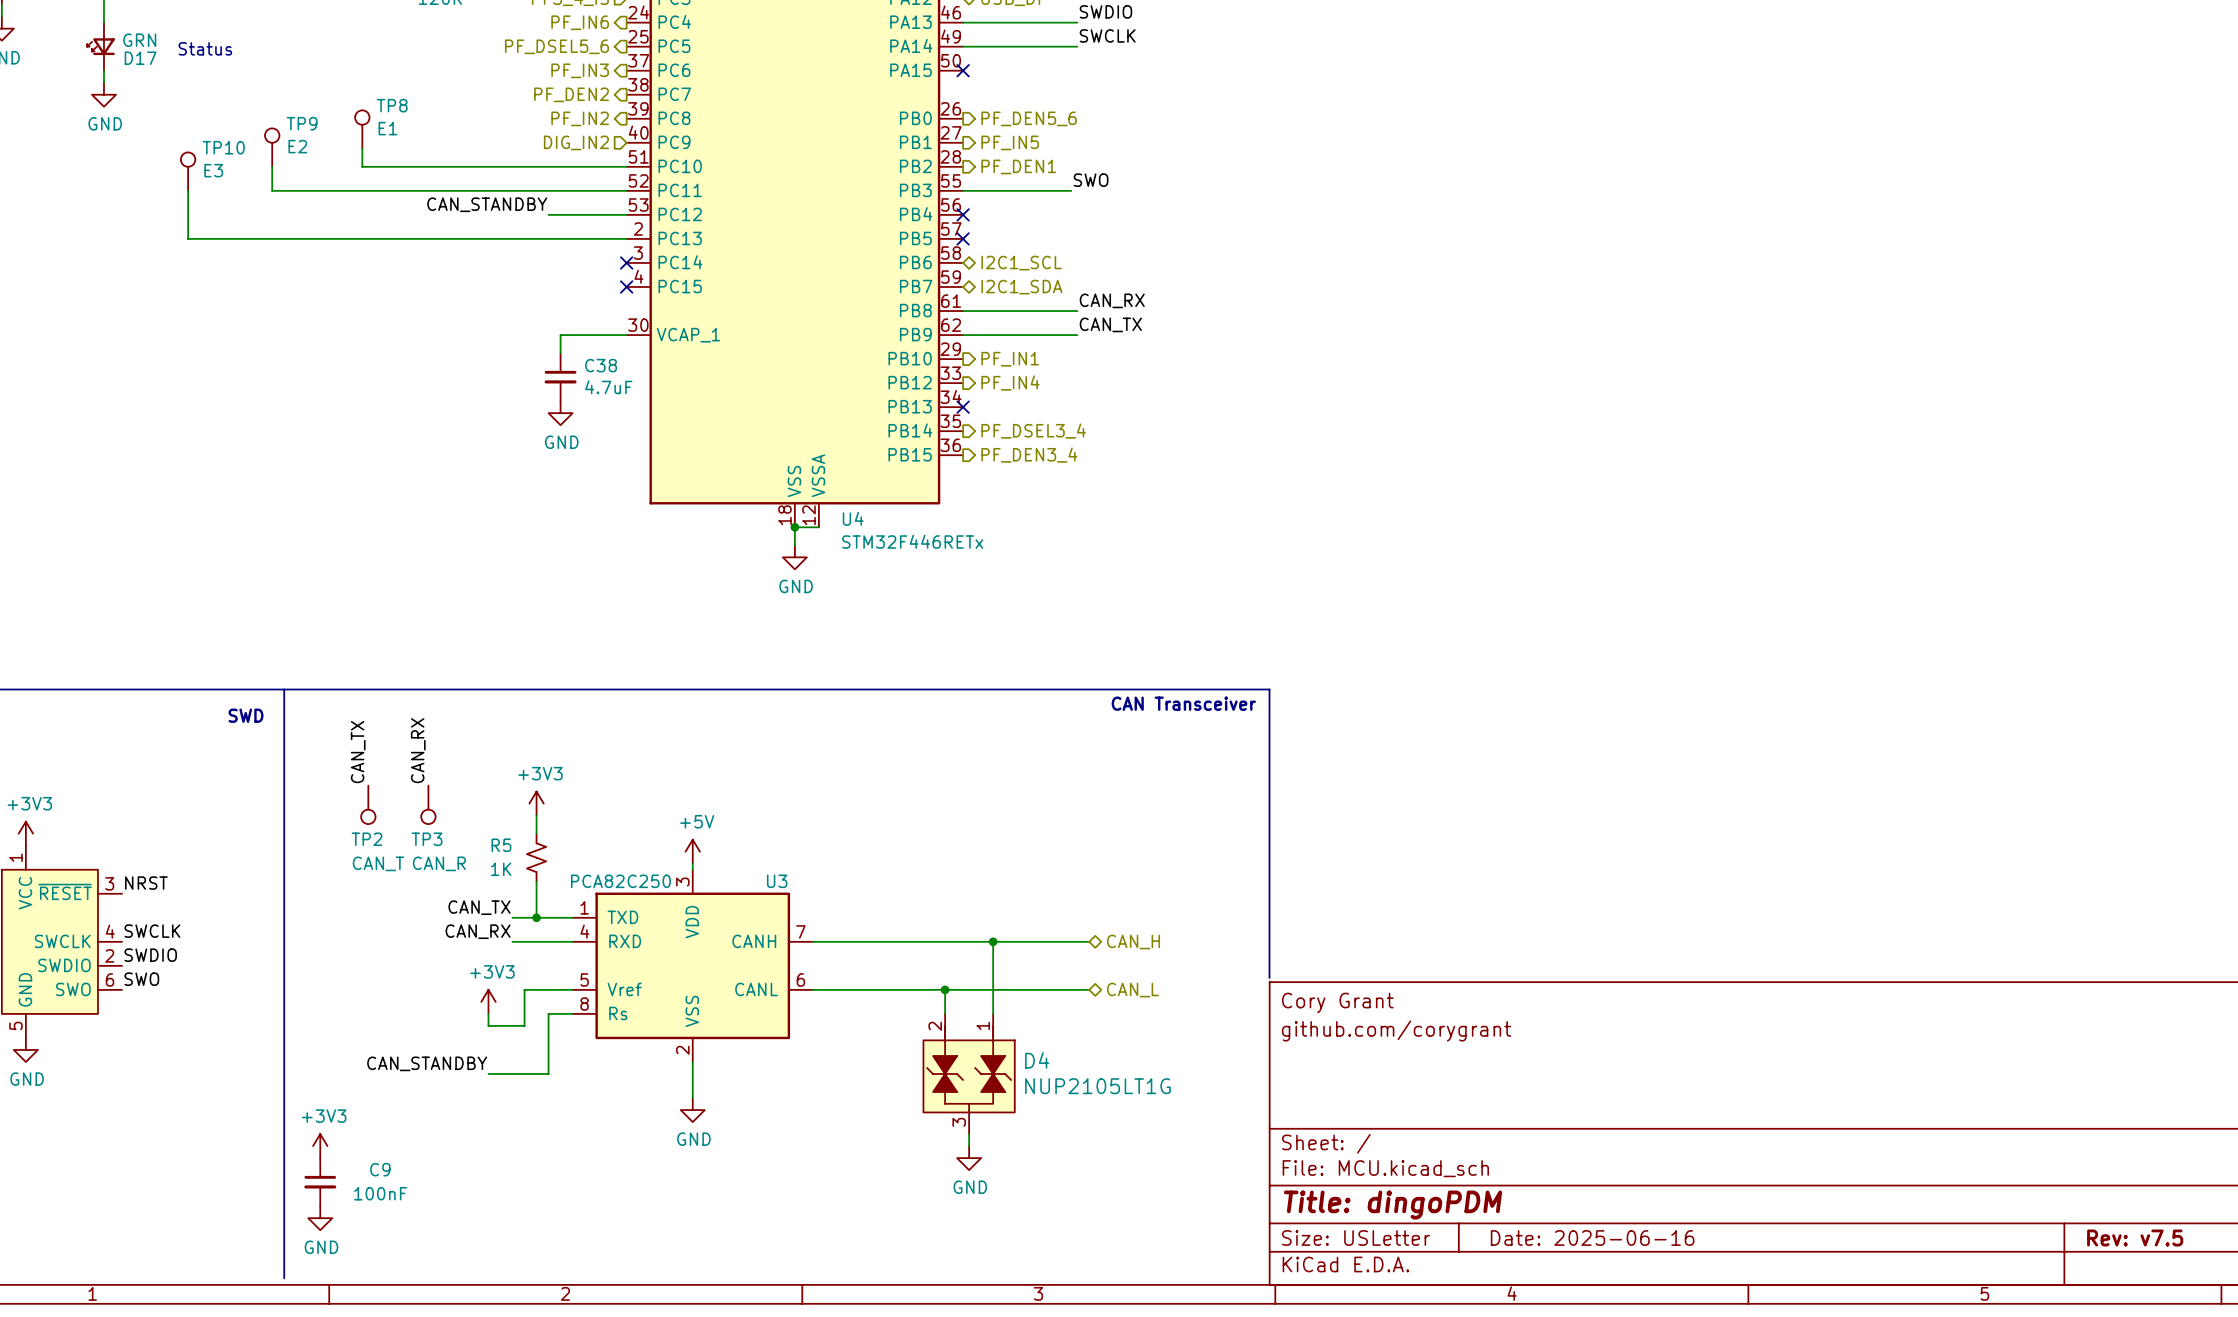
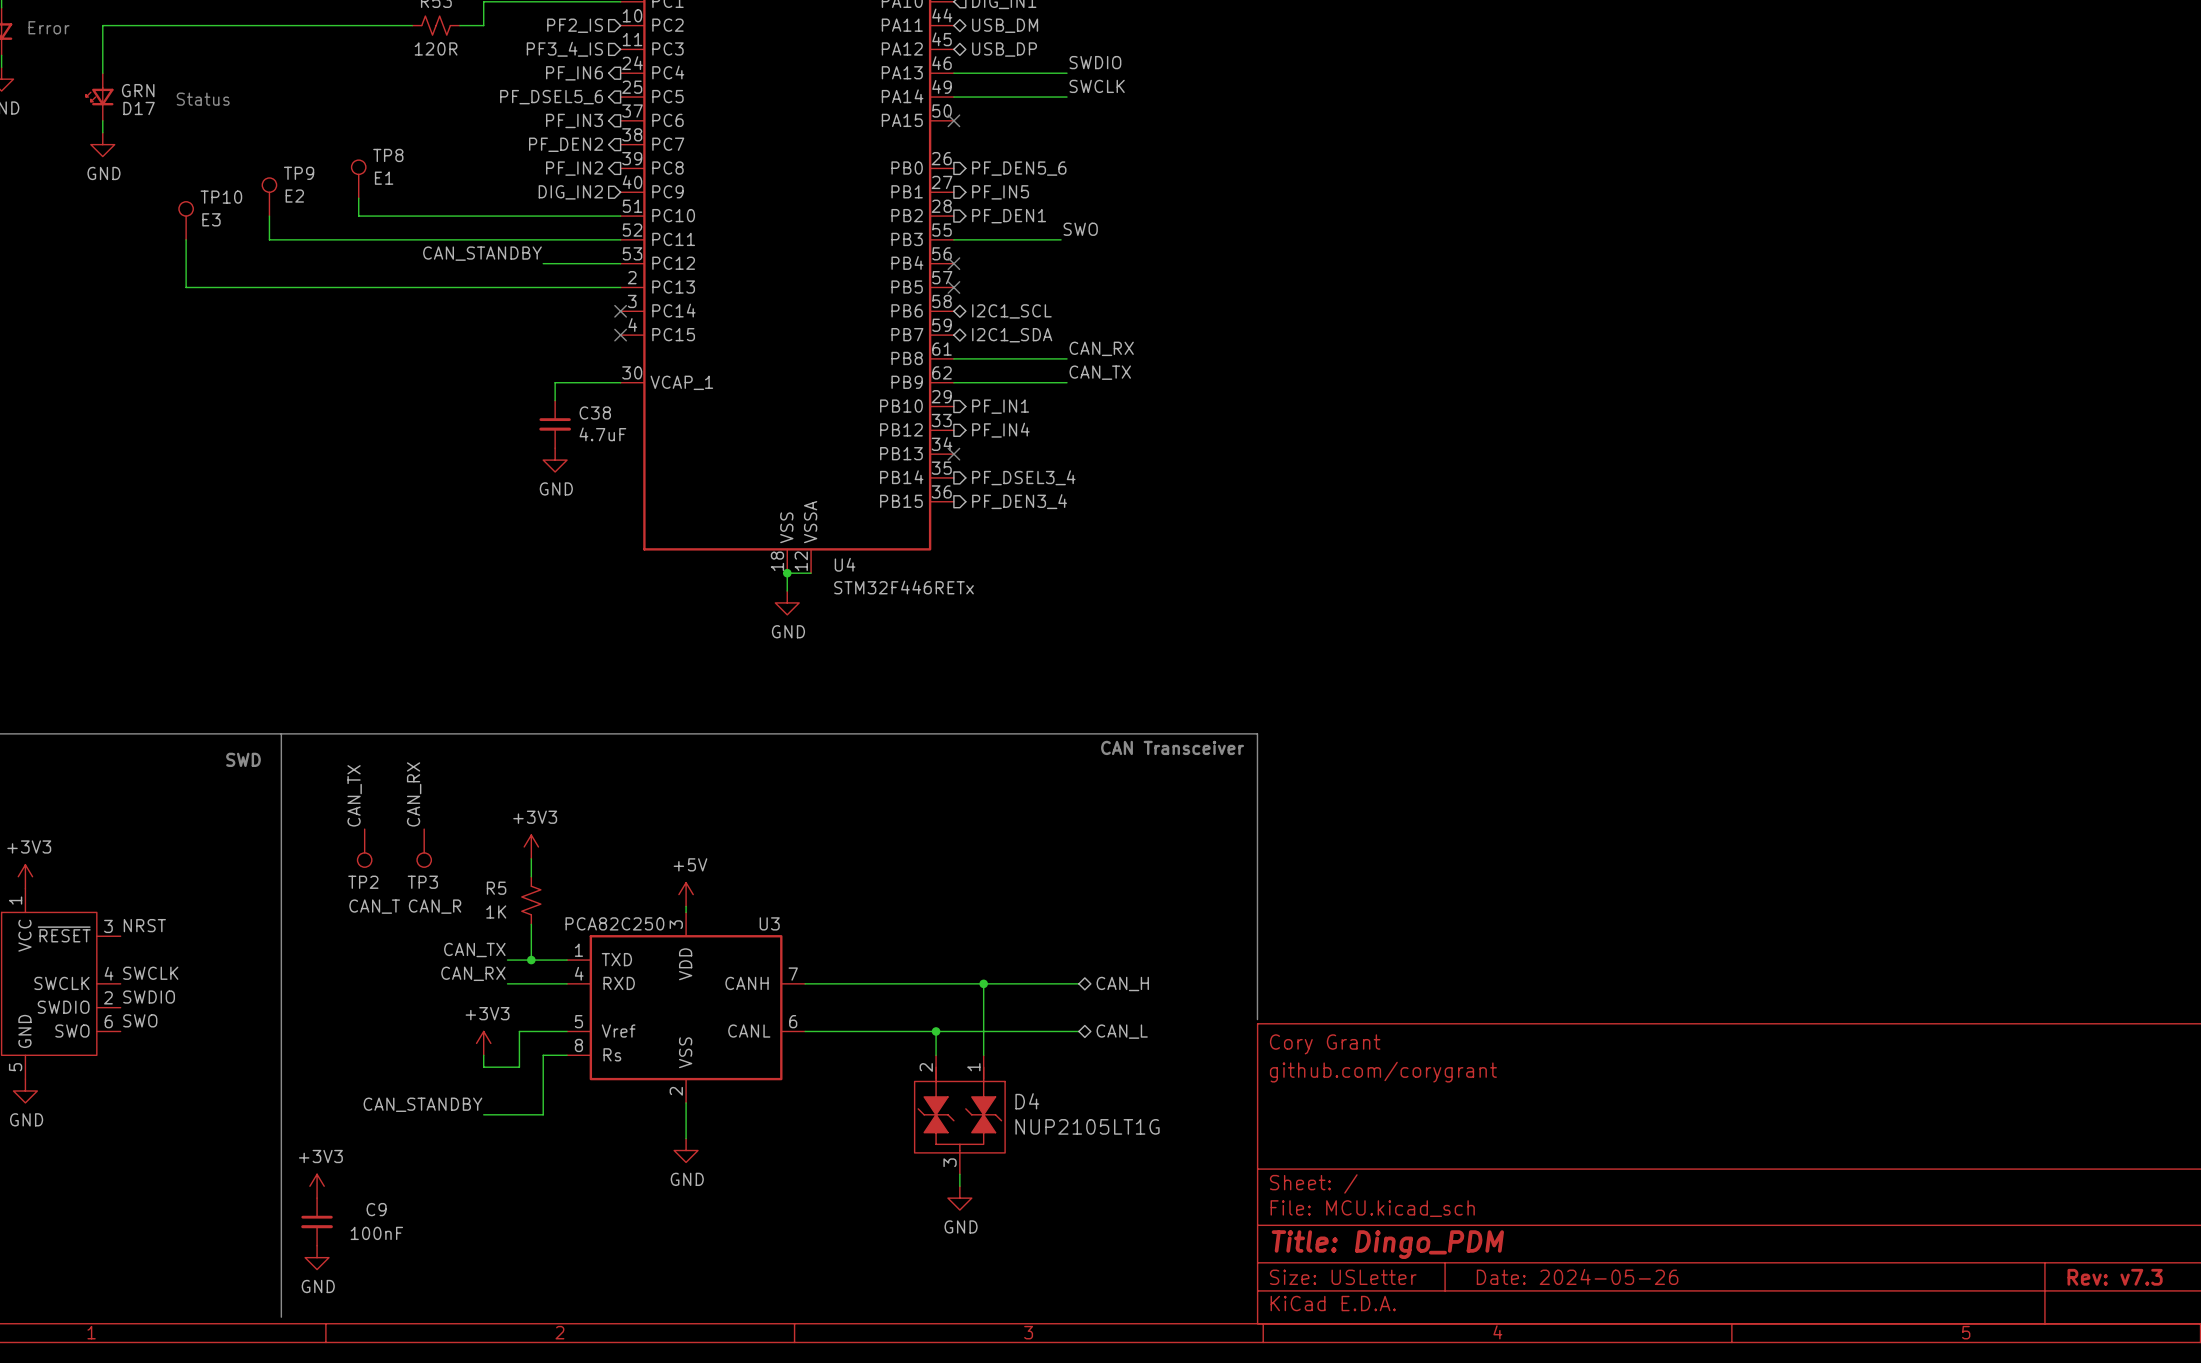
title block: Title: dingoPDM (1392, 1205) -> Title: Dingo_PDM (1387, 1244)
title block: Date: 2025-06-16 (1592, 1238) -> Date: 2024-05-26 (1577, 1276)
title block: Rev: v7.5 (2135, 1238) -> Rev: v7.3 (2115, 1277)

